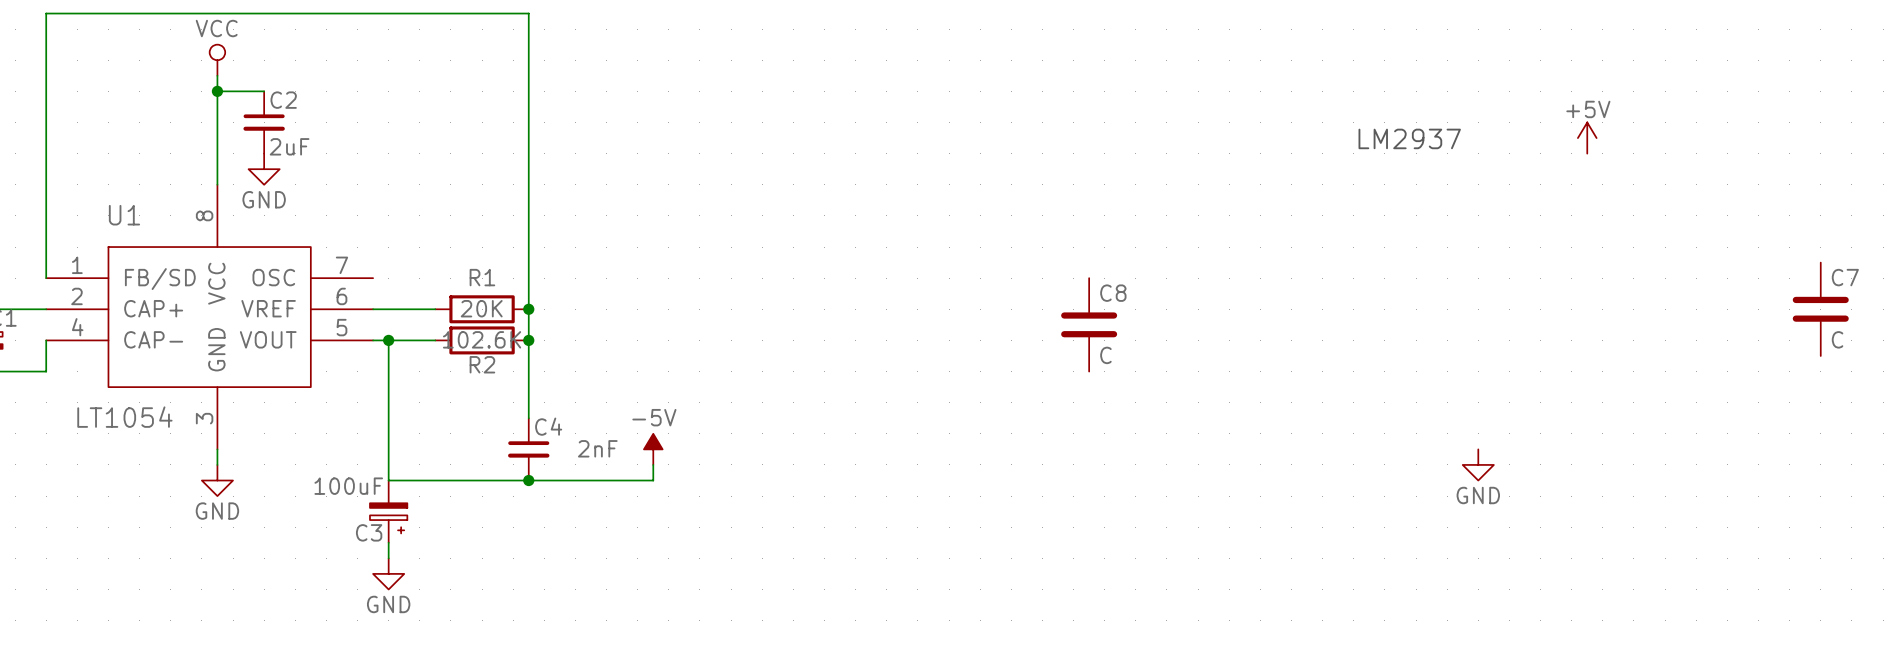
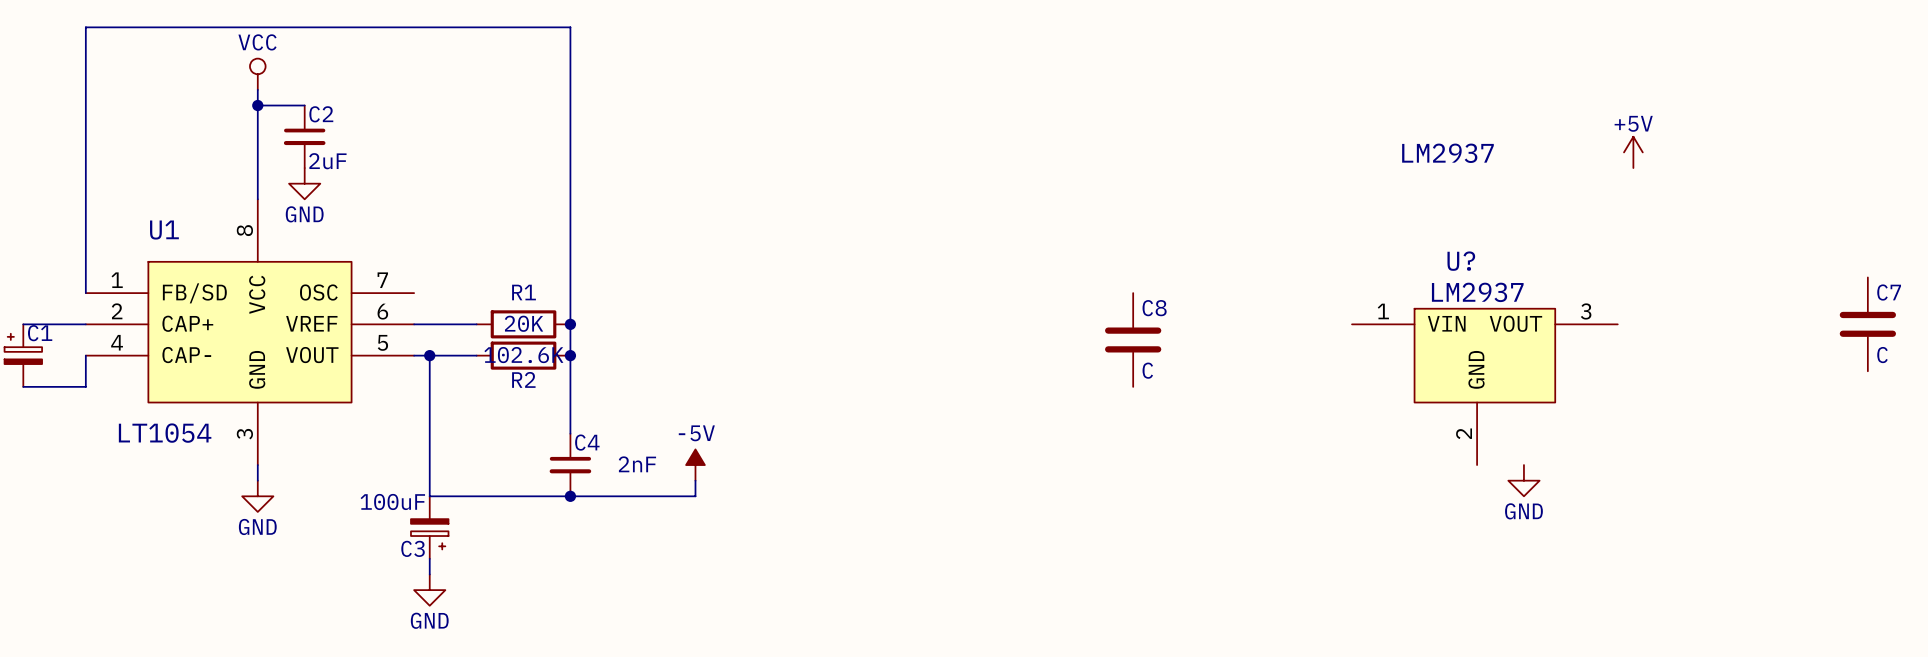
U?: none -> LM2937 (1484, 386)

